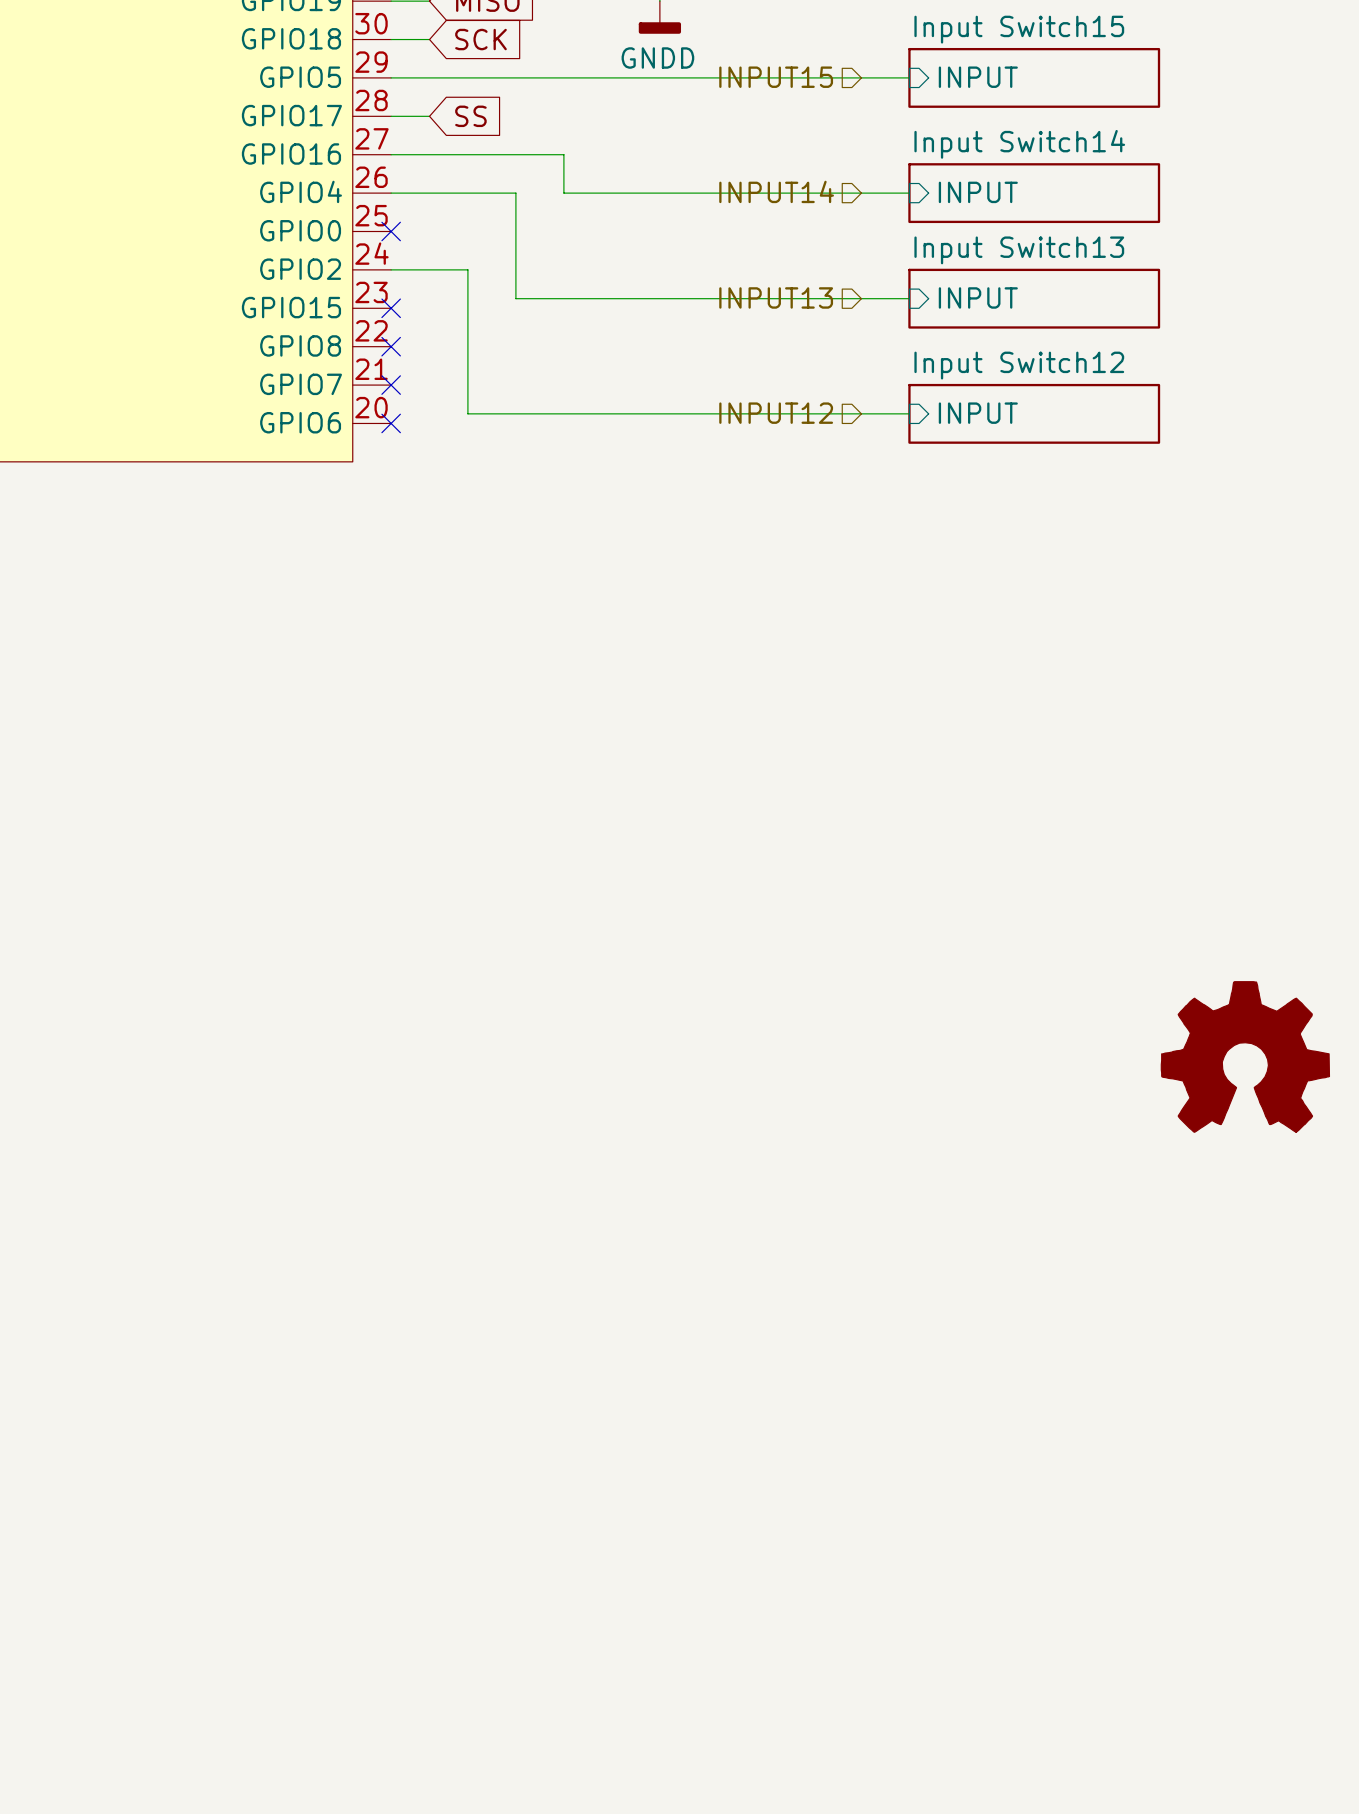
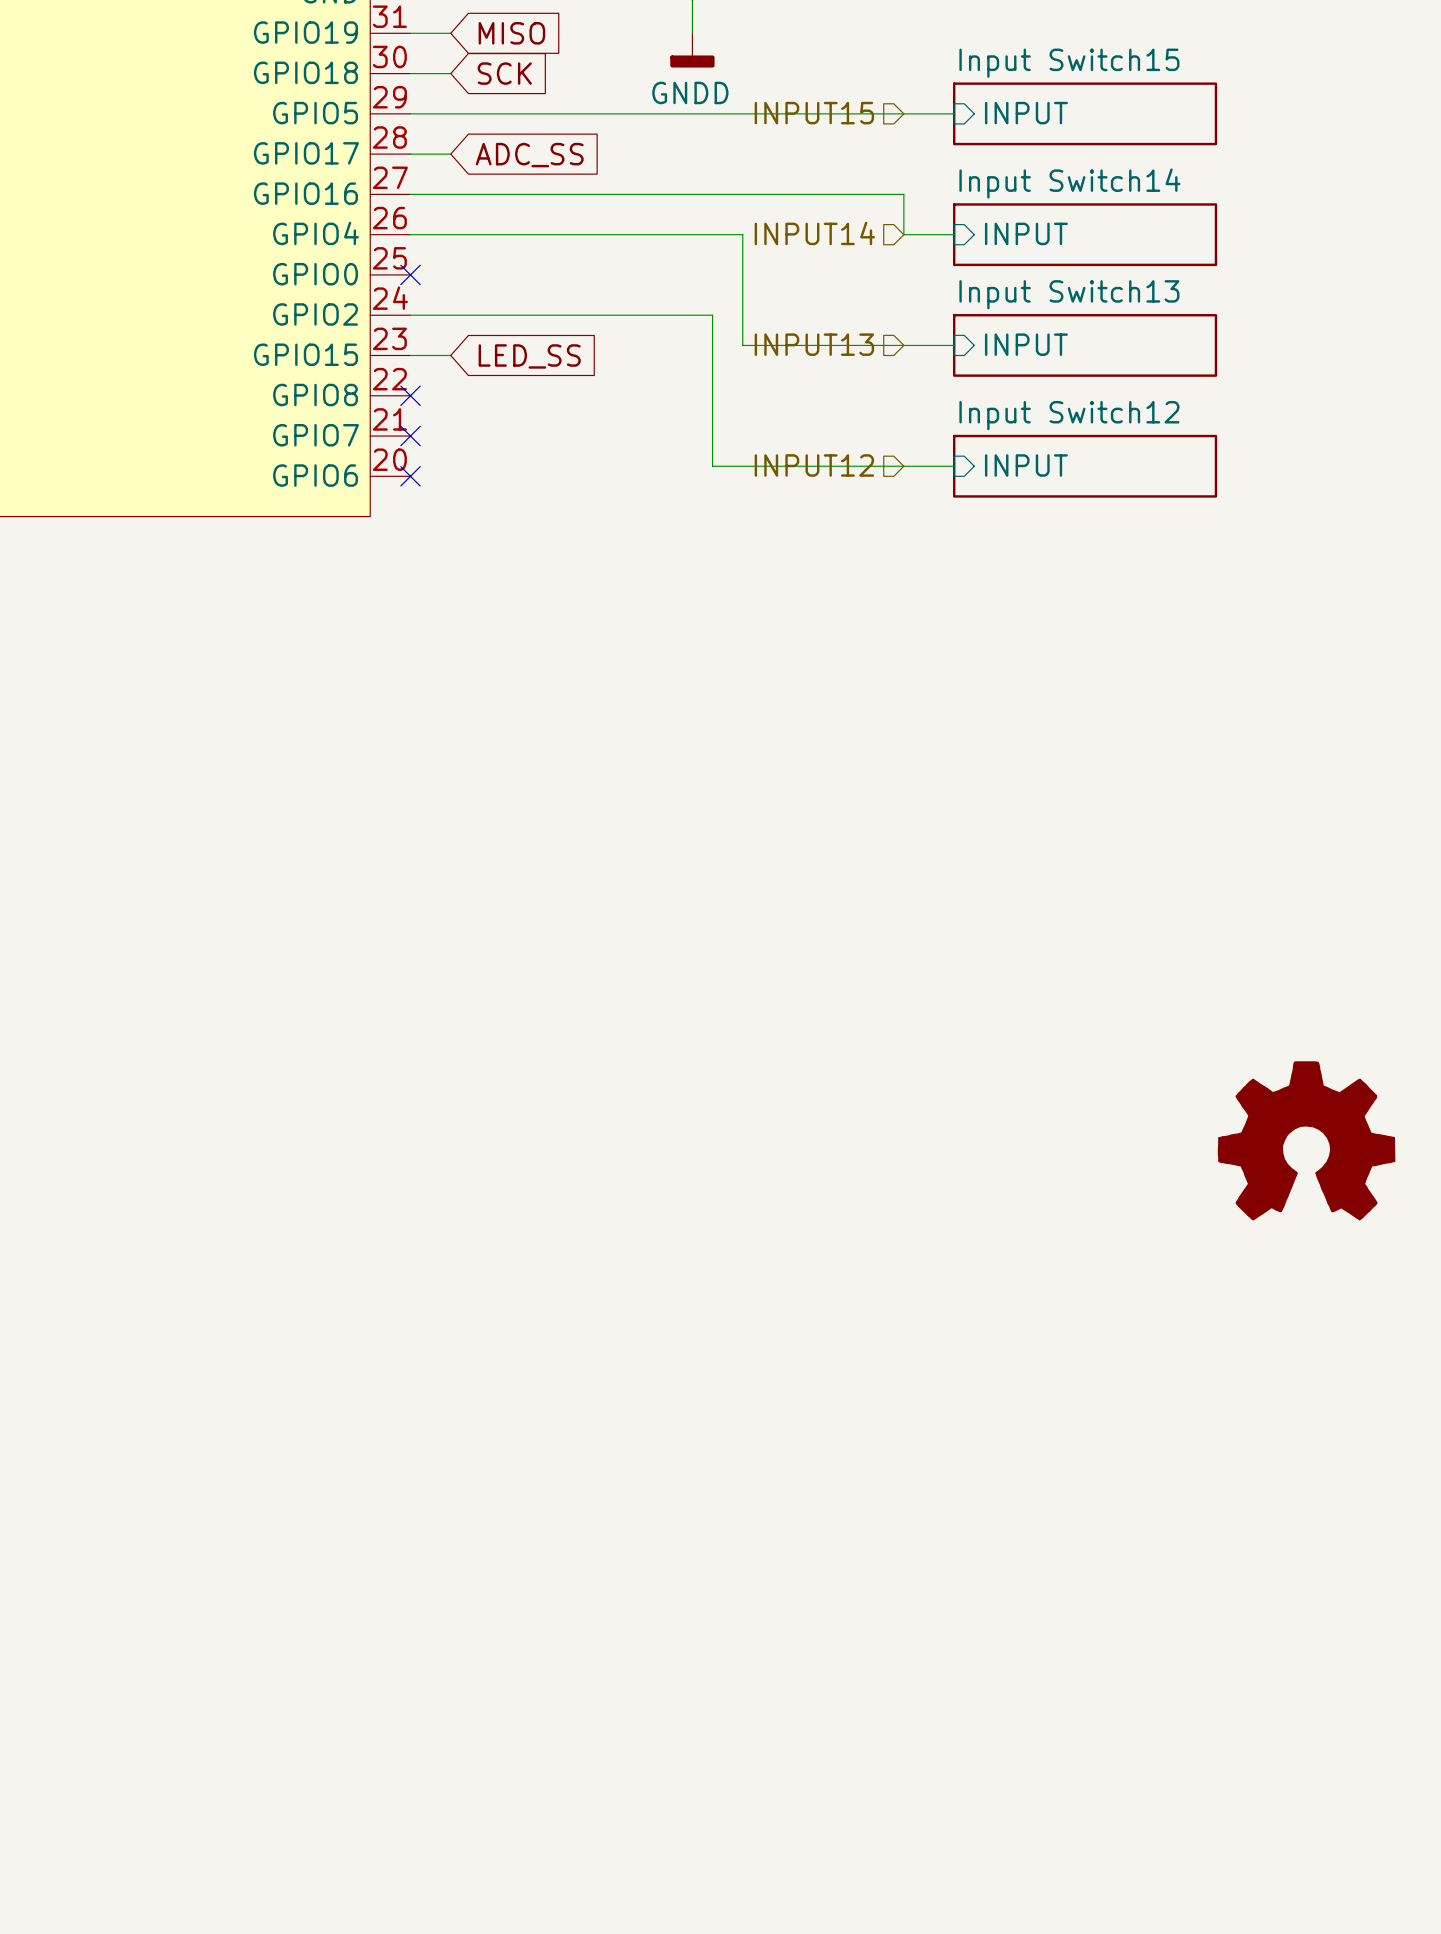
global label: SS (470, 116) -> ADC_SS (529, 155)
wire: (563, 154) (563, 193) -> (541, 234) (591, 234)
wire: (515, 193) (515, 298) (707, 298) -> (742, 234) (742, 345)
wire: (707, 193) (861, 193) -> (591, 194) (903, 194) (903, 234)
wire: (467, 269) (467, 413) (679, 413) -> (491, 315) (712, 315) (712, 466)
wire: none -> (410, 355) (450, 355)
no-connect mark: (391, 308) -> none
global label: none -> LED_SS (529, 356)

